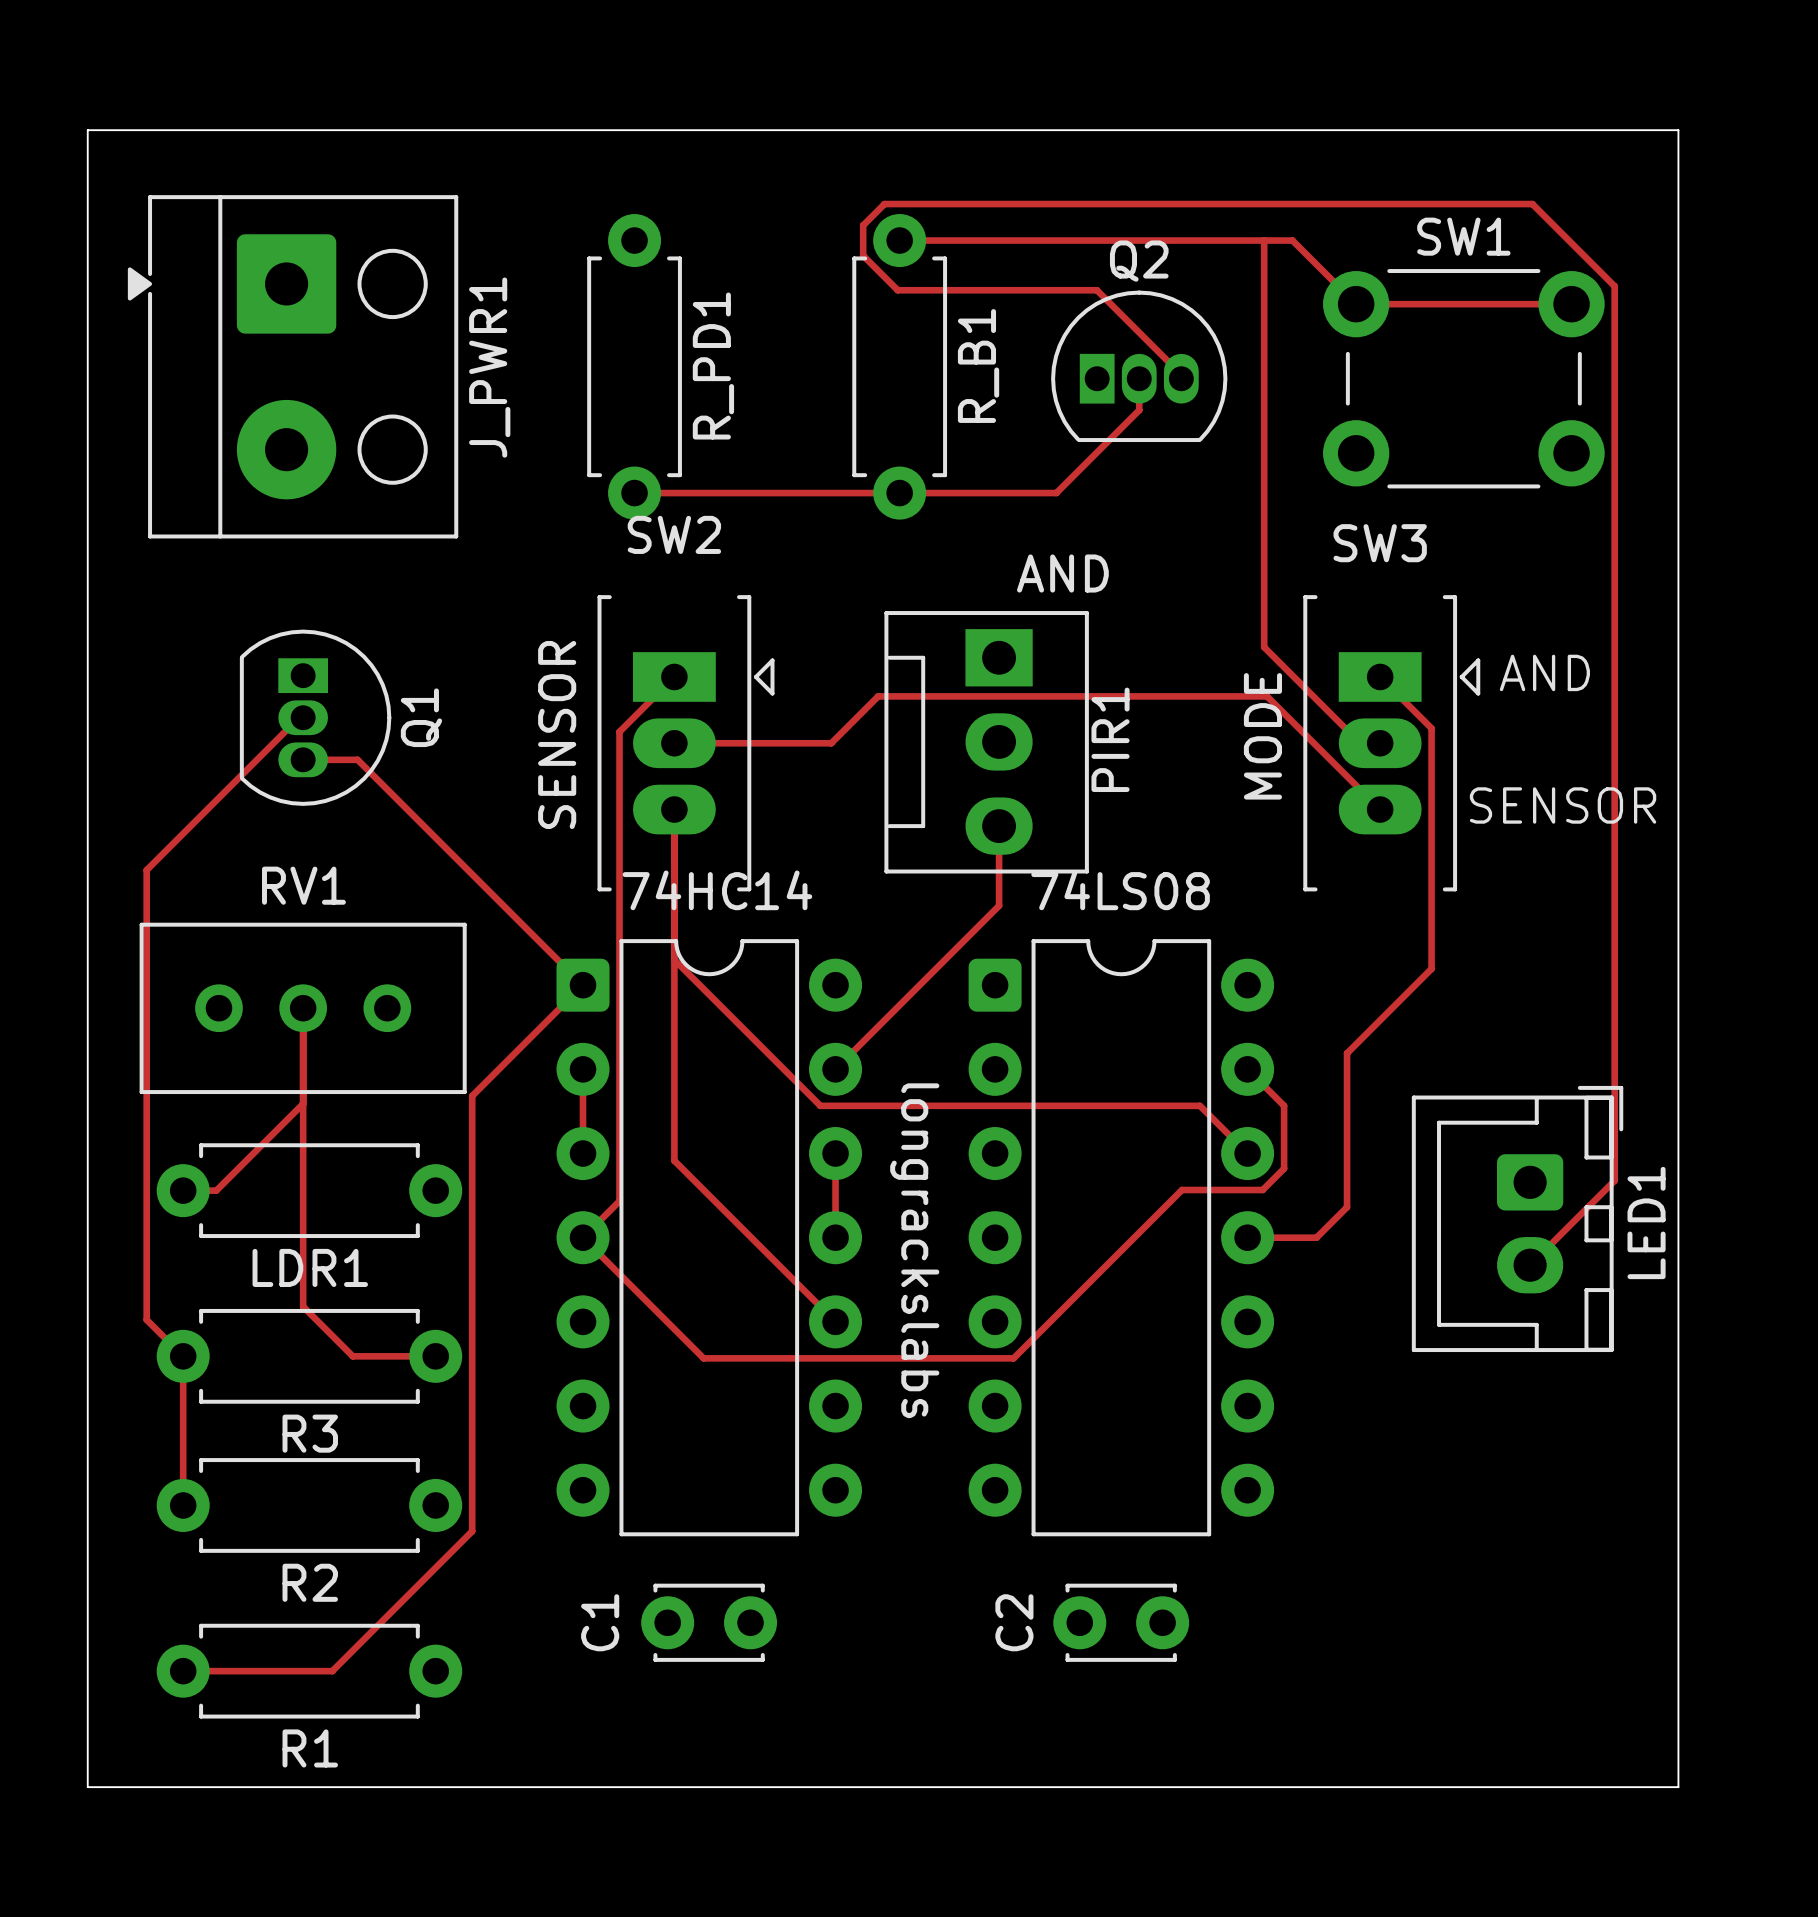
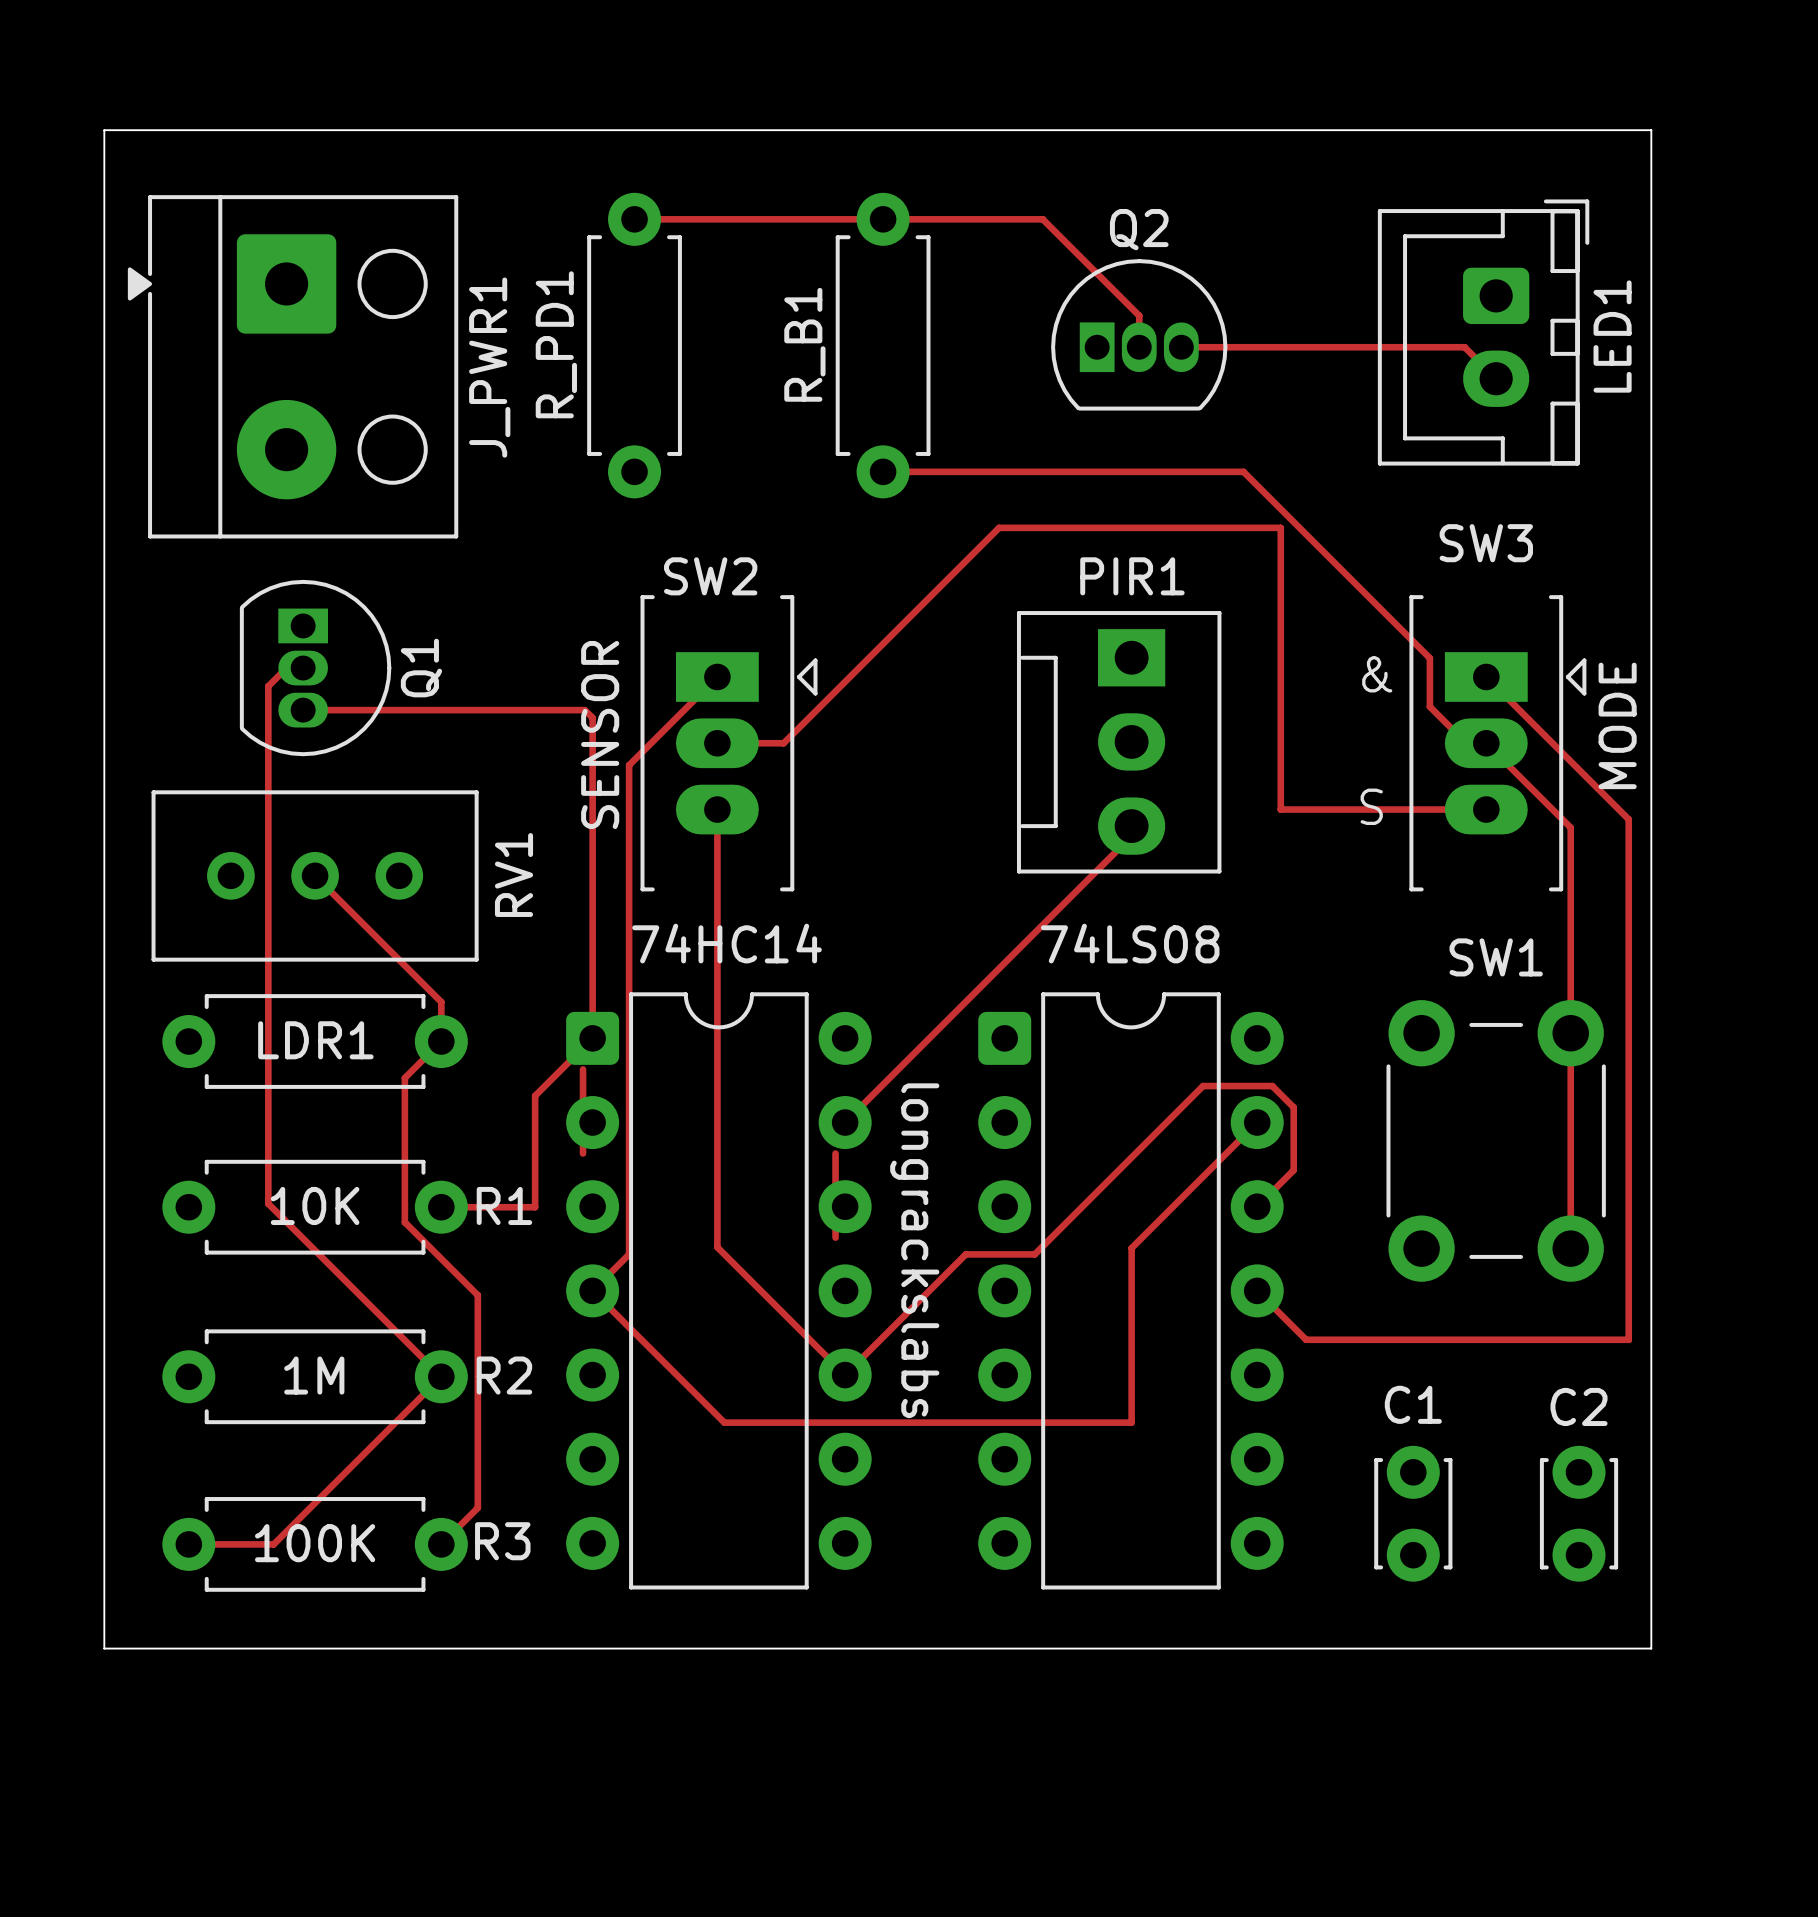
board edge: (104, 130) (87, 130) (87, 1787) (1678, 1787) (1678, 130) (1651, 130) -> (104, 130) (104, 1648) (1651, 1648) (1651, 130)
track: none -> (634, 219) (1042, 219) (1139, 315) (1139, 347)
track: (899, 240) (1292, 240) (1356, 304) -> none
track: (1264, 240) (1264, 647) (1360, 743) (1380, 743) -> none
track: (1355, 304) (1571, 304) -> none
track: none -> (1181, 347) (1464, 347) (1496, 378)
R_PD1 position: (634, 366) -> (634, 345)
R_PD1 name position: R_PD1 (713, 366) -> R_PD1 (556, 344)
R_B1 position: (899, 366) -> (883, 345)
R_B1 name position: R_B1 (978, 366) -> R_B1 (804, 344)
Q2 position: (1139, 366) -> (1139, 334)
track: (1139, 378) (1139, 410) (1056, 493) (634, 493) -> none
track: (1181, 378) (1181, 374) (1096, 290) (897, 290) (863, 255) (863, 225) (884, 204) (1532, 204) (1614, 286) (1614, 1180) (1530, 1265) -> none
SW1 rotation: 0° (1463, 378) -> 90° clockwise (1496, 1140)
SW1 position: (1463, 378) -> (1496, 1140)
track: none -> (883, 471) (1243, 471) (1429, 658) (1429, 706) (1466, 743) (1486, 743) (1570, 827) (1570, 1248)
SW2 name position: SW2 (674, 534) -> SW2 (710, 576)
text: AND (1062, 573) -> none
track: none -> (303, 668) (286, 668) (268, 686) (268, 1203) (441, 1376) (273, 1544) (188, 1544)
text: AND (1544, 672) -> none
text: none -> & (1377, 674)
track: (674, 676) (619, 731) (619, 1201) (583, 1237) (703, 1358) (1013, 1358) (1181, 1190) (1262, 1190) (1284, 1168) (1284, 1105) (1247, 1069) -> none
track: none -> (717, 676) (629, 765) (629, 1254) (592, 1290) (724, 1422) (1131, 1422) (1131, 1248) (1257, 1122)
track: (1380, 676) (1431, 728) (1431, 968) (1347, 1053) (1347, 1207) (1316, 1237) (1247, 1237) -> none
track: none -> (1486, 676) (1628, 819) (1628, 1339) (1306, 1339) (1257, 1290)
track: none -> (303, 710) (584, 710) (592, 717) (592, 1038) (535, 1095) (535, 1207) (441, 1207)
track: (299, 717) (146, 870) (146, 1319) (183, 1356) (183, 1505) -> none
Q1 position: (315, 717) -> (315, 668)
SW3 value position: MODE (1262, 736) -> MODE (1617, 725)
PIR1 name rotation: 0° (1110, 739) -> 90° clockwise (1132, 576)
PIR1 name position: PIR1 (1110, 739) -> PIR1 (1132, 576)
PIR1 position: (986, 742) -> (1119, 742)
SW2 position: (686, 743) -> (728, 743)
track: (783, 743) (831, 743) (878, 696) (1267, 696) (1380, 809) -> (783, 743) (999, 527) (1280, 527) (1280, 809) (1486, 809)
SW3 position: (1391, 743) -> (1497, 743)
track: (303, 759) (357, 759) (583, 985) (472, 1095) (472, 1531) (332, 1671) (183, 1671) -> none
text: SENSOR (1563, 805) -> none
text: none -> S (1371, 806)
track: (674, 809) (674, 1160) (835, 1321) -> none
track: none -> (717, 809) (717, 1247) (845, 1375) (965, 1254) (1034, 1254) (1203, 1086) (1272, 1086) (1293, 1107) (1293, 1170) (1257, 1206)
track: (999, 826) (999, 905) (835, 1069) -> none
track: none -> (1131, 826) (1131, 836) (845, 1122) (845, 1112)
track: none -> (315, 875) (441, 1002) (441, 1041) (404, 1078) (404, 1222) (477, 1295) (477, 1507) (441, 1544)
RV1 name rotation: 0° (303, 885) -> 90° counterclockwise (514, 875)
RV1 name position: RV1 (303, 885) -> RV1 (514, 875)
track: (674, 959) (820, 1105) (1199, 1105) (1247, 1153) -> none
track: (303, 1008) (303, 1306) (352, 1356) (435, 1356) -> none
RV1 position: (303, 1008) -> (315, 875)
track: (303, 1103) (216, 1190) (183, 1190) -> none
LDR1 position: (309, 1190) -> (315, 1041)
R1 value: none -> 10K (315, 1205)
LED1 position: (1517, 1218) -> (1483, 332)
part position: (709, 1237) -> (718, 1290)
part position: (1121, 1237) -> (1130, 1290)
LDR1 name position: LDR1 (310, 1267) -> LDR1 (315, 1040)
R3 position: (309, 1356) -> (315, 1544)
R2 value: none -> 1M (314, 1375)
R3 name position: R3 (310, 1433) -> R3 (502, 1541)
R2 position: (309, 1505) -> (315, 1376)
R3 value: none -> 100K (315, 1543)
R2 name position: R2 (310, 1582) -> R2 (504, 1375)
C1 rotation: 0° (709, 1622) -> 90° clockwise (1413, 1513)
C1 position: (709, 1622) -> (1413, 1513)
C2 rotation: 0° (1121, 1622) -> 90° clockwise (1579, 1513)
C2 position: (1121, 1622) -> (1579, 1513)
R1 position: (309, 1671) -> (315, 1207)
R1 name position: R1 (310, 1748) -> R1 (504, 1205)

